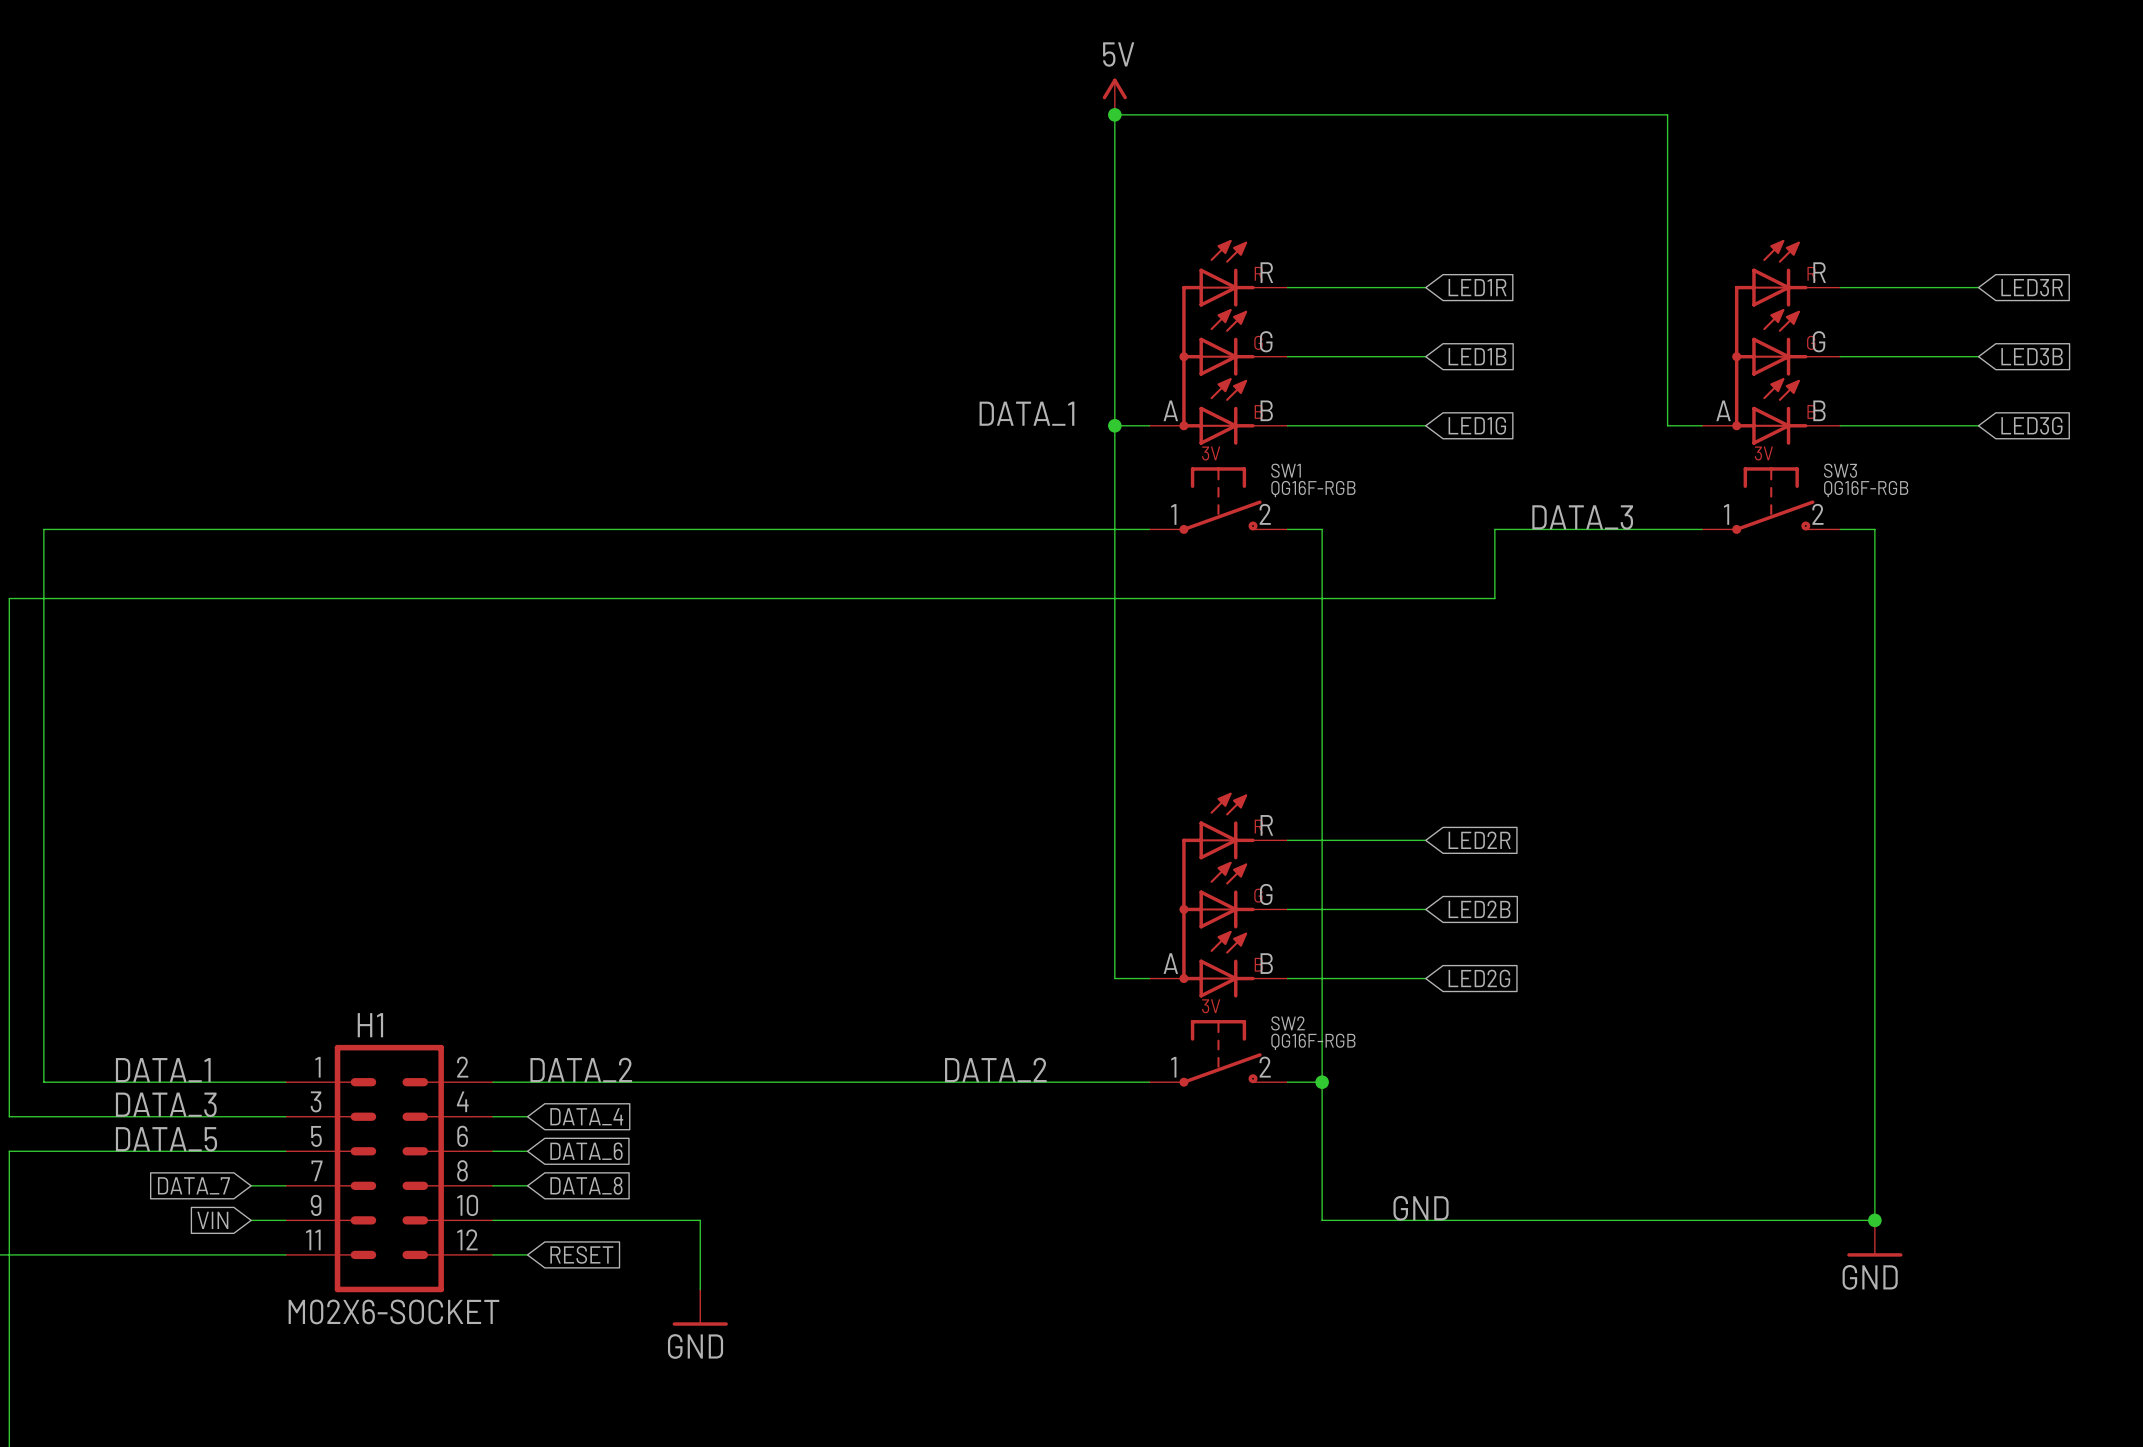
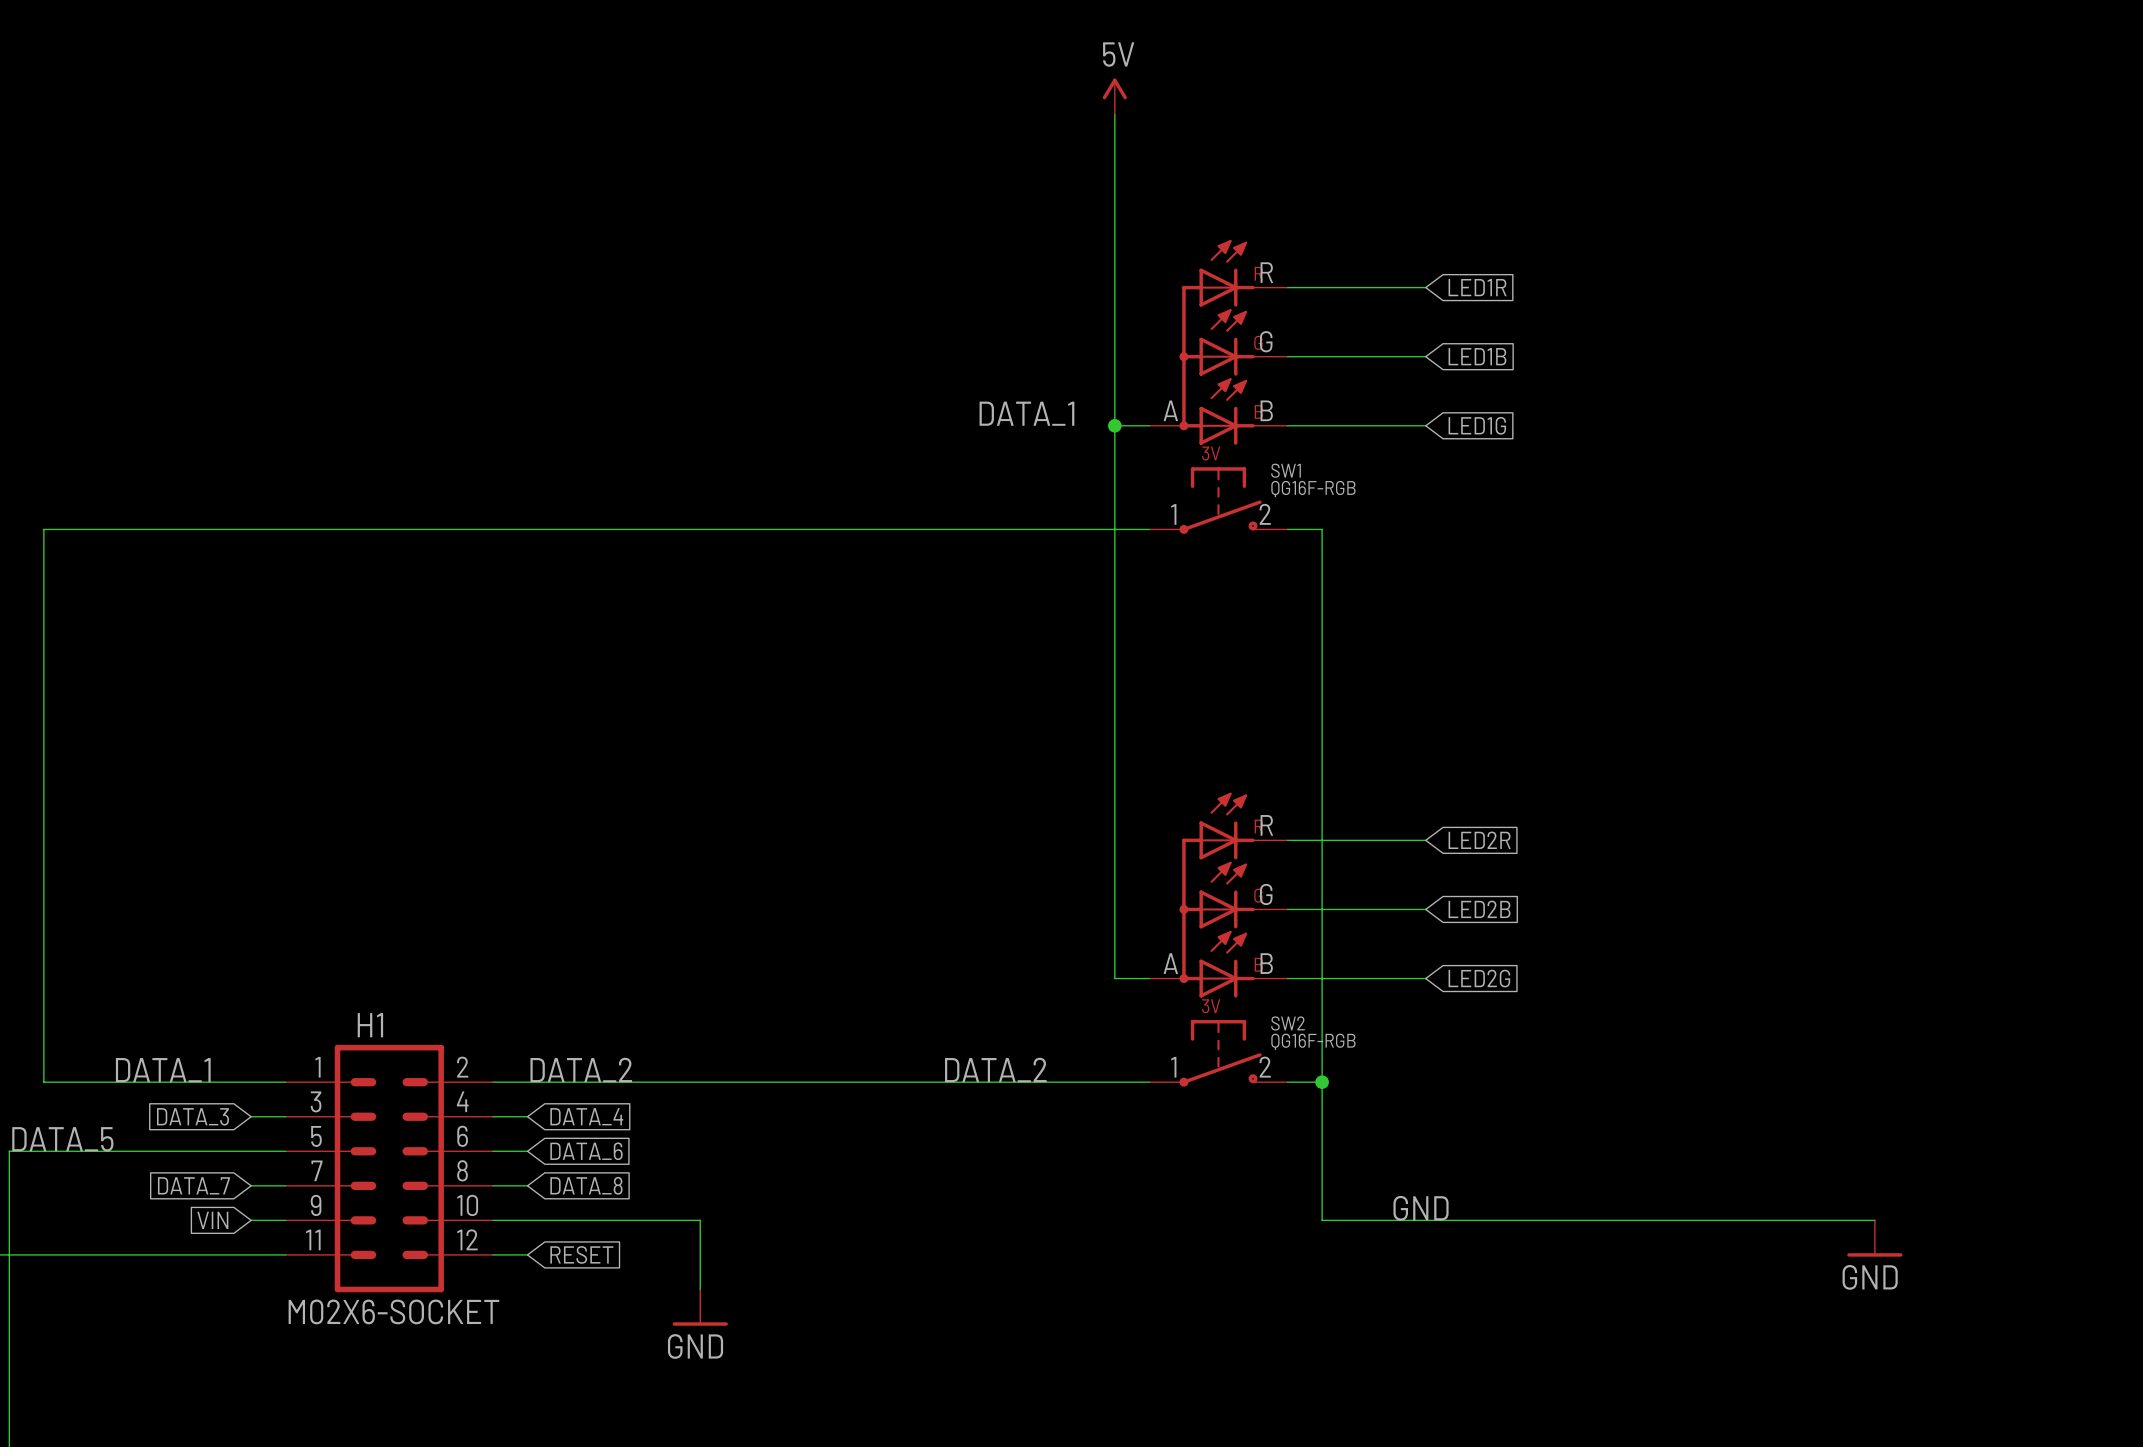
wire: (1114, 114) (1667, 114) (1667, 425) (1702, 425) -> none
junction: (1114, 114) -> none
wire: (1840, 287) (1978, 287) -> none
global label: LED3R (2032, 287) -> none
wire: (1840, 356) (1978, 356) -> none
global label: LED3B (2032, 356) -> none
SW3: QG16F-RGB (1771, 386) -> none
wire: (1840, 425) (1978, 425) -> none
global label: LED3G (2031, 425) -> none
label: DATA_3 (1582, 517) -> none
wire: (1702, 529) (1494, 529) (1494, 598) (9, 598) (9, 1116) (251, 1116) -> none
wire: (1840, 529) (1874, 529) (1874, 1220) -> none
label: DATA_3 (166, 1104) -> none
global label: none -> DATA_3 (192, 1116)
label position: DATA_5 (166, 1139) -> DATA_5 (62, 1139)
junction: (1874, 1220) -> none

